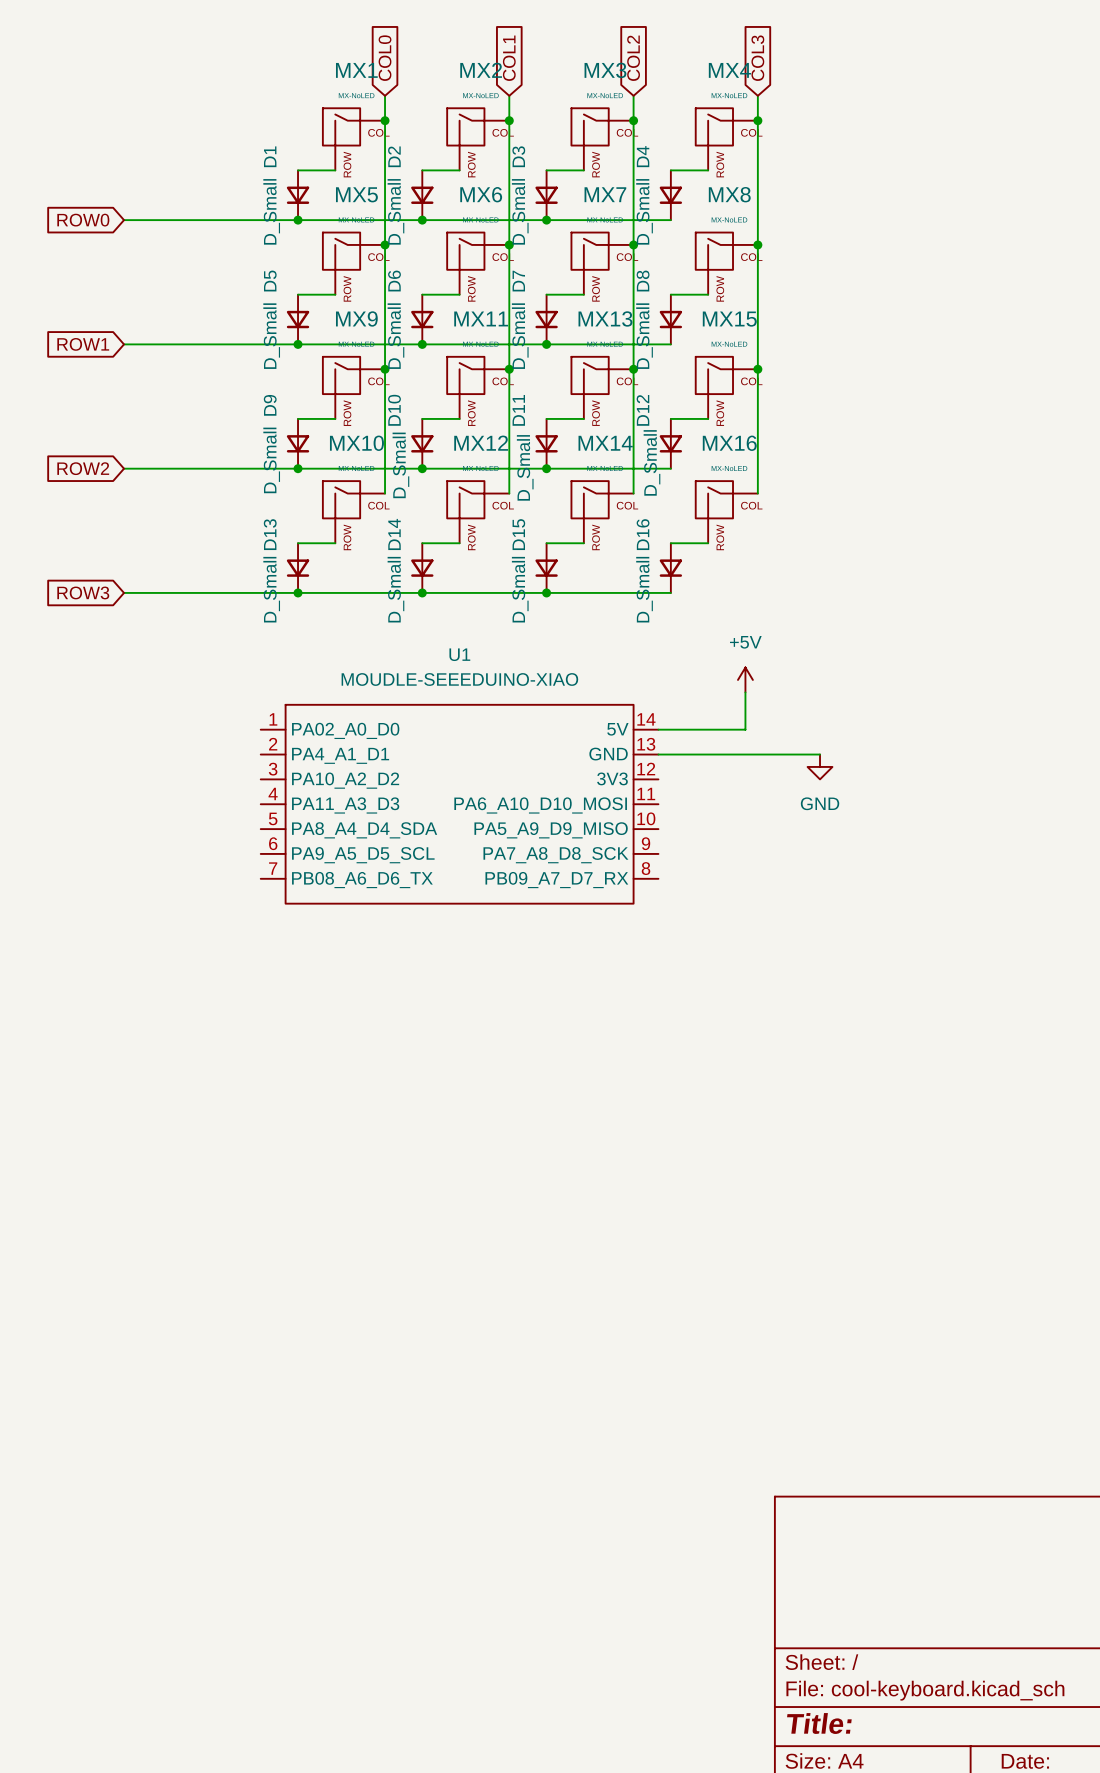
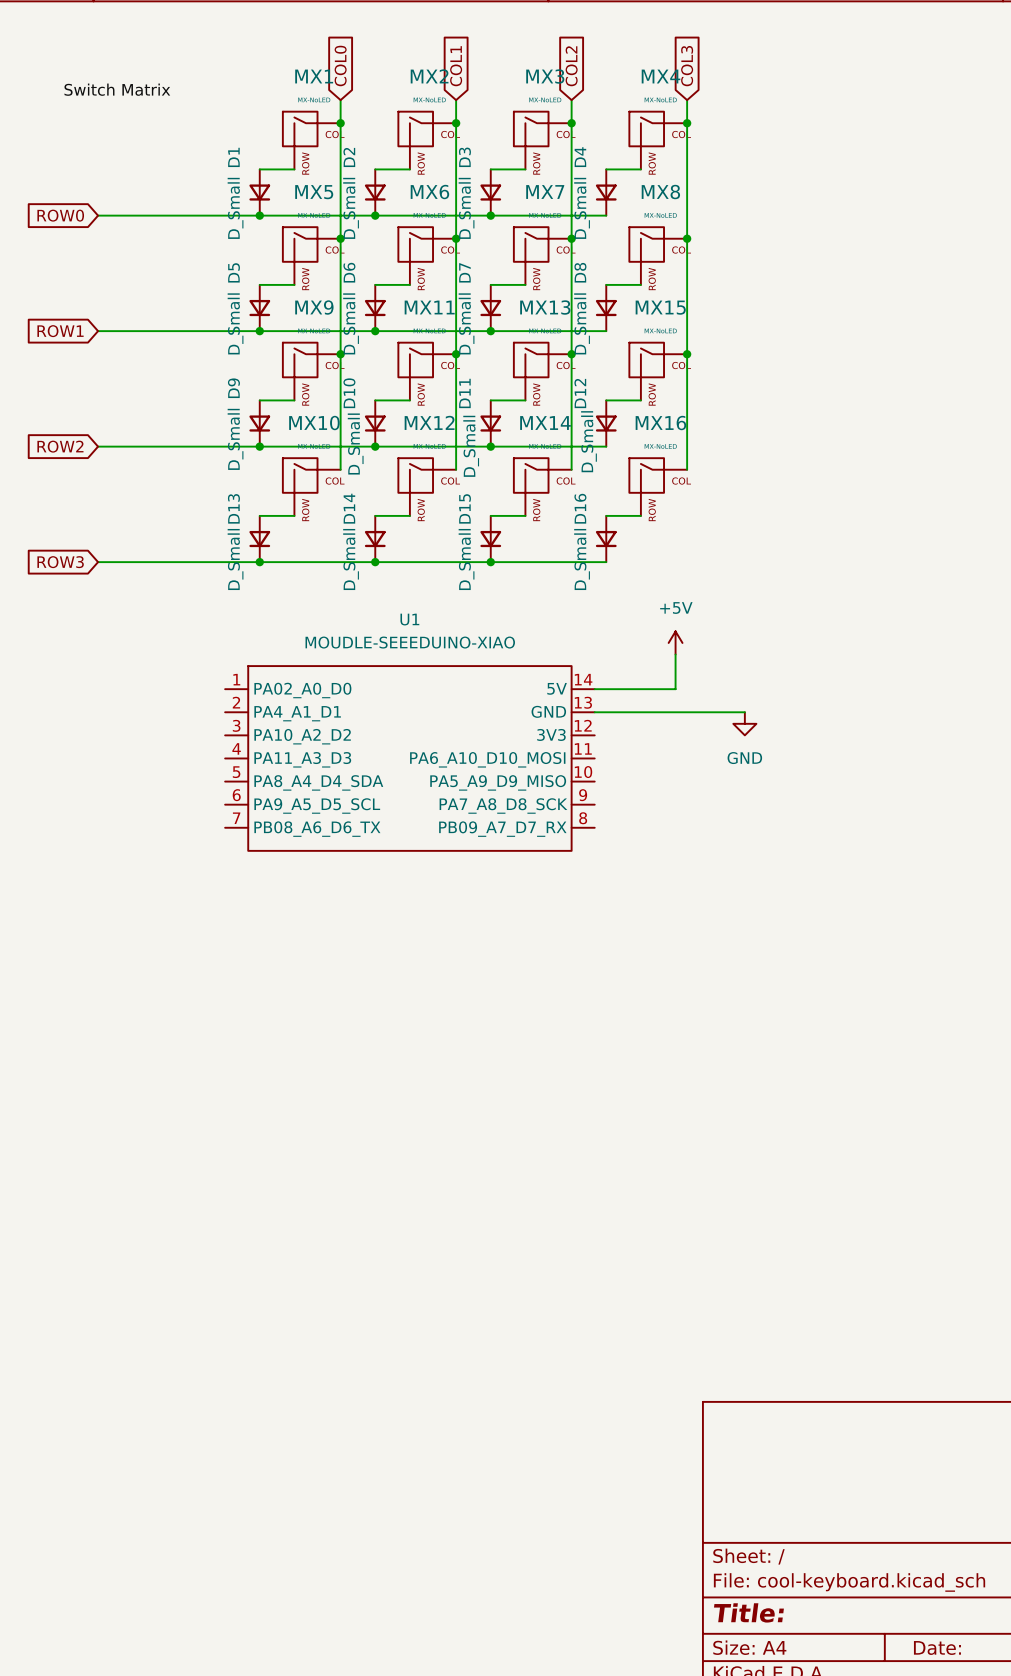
label: none -> Switch Matrix (117, 89)

